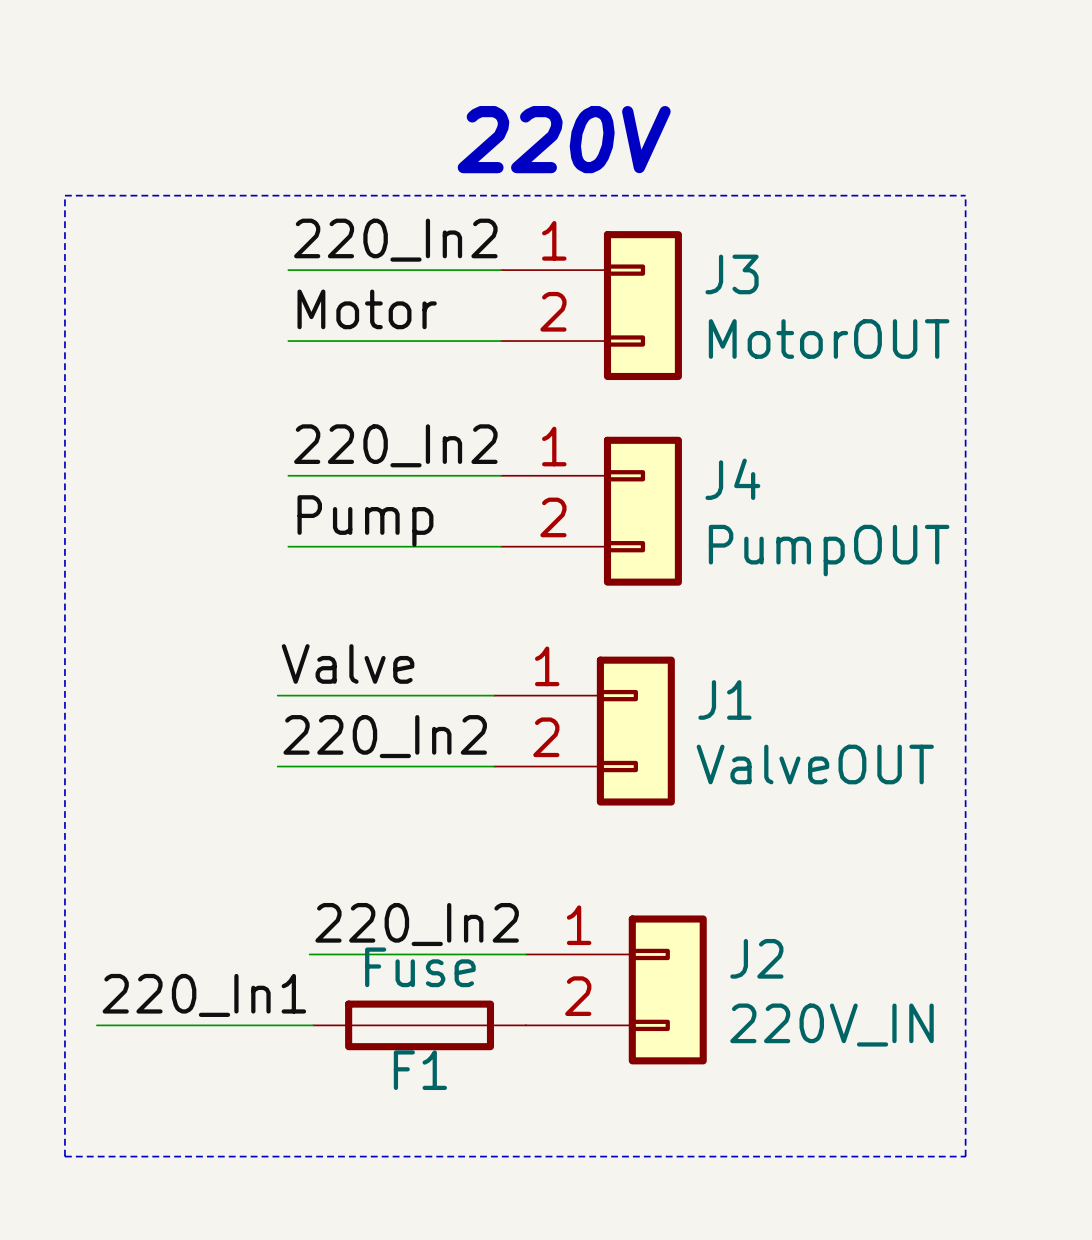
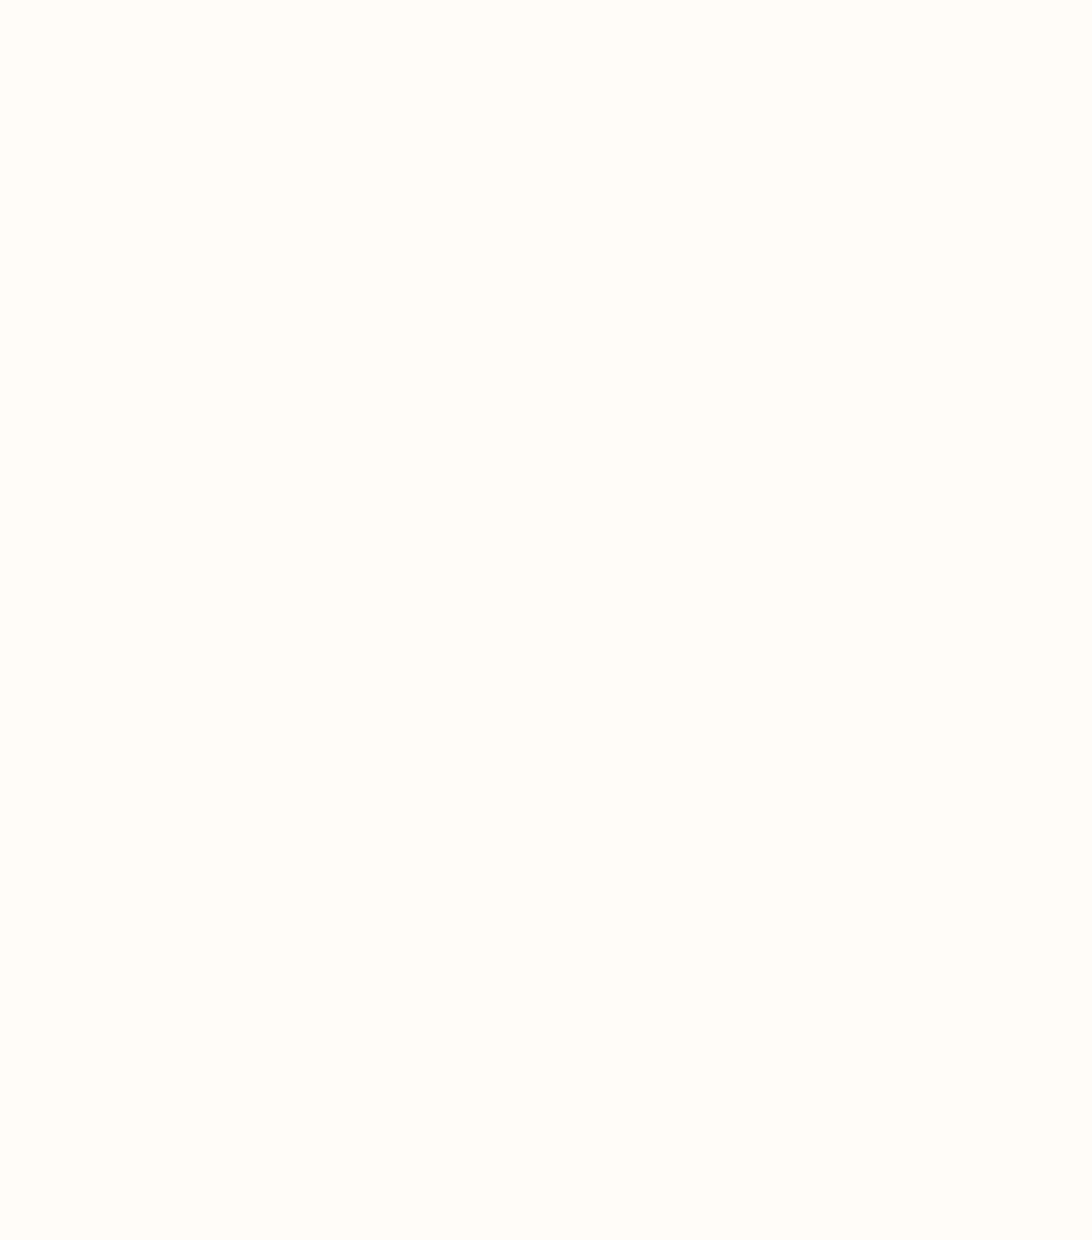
text: 220V (564, 139) -> none
line: (64, 195) (64, 1156) (965, 1156) (965, 195) (64, 195) -> none
label: 220_In2 (395, 240) -> none
wire: (288, 270) (501, 270) -> none
J3: MotorOUT (591, 305) -> none
label: Motor (367, 309) -> none
wire: (288, 341) (501, 341) -> none
label: 220_In2 (395, 445) -> none
wire: (288, 475) (501, 475) -> none
J4: PumpOUT (591, 511) -> none
label: Pump (365, 520) -> none
wire: (288, 546) (501, 546) -> none
label: Valve (348, 663) -> none
wire: (277, 695) (494, 695) -> none
J1: ValveOUT (584, 731) -> none
label: 220_In2 (385, 736) -> none
wire: (277, 766) (494, 766) -> none
label: 220_In2 (417, 924) -> none
wire: (309, 954) (525, 954) -> none
J2: 220V_IN (616, 989) -> none
label: 220_In1 (204, 995) -> none
wire: (96, 1025) (313, 1025) -> none
F1: Fuse (419, 1025) -> none

